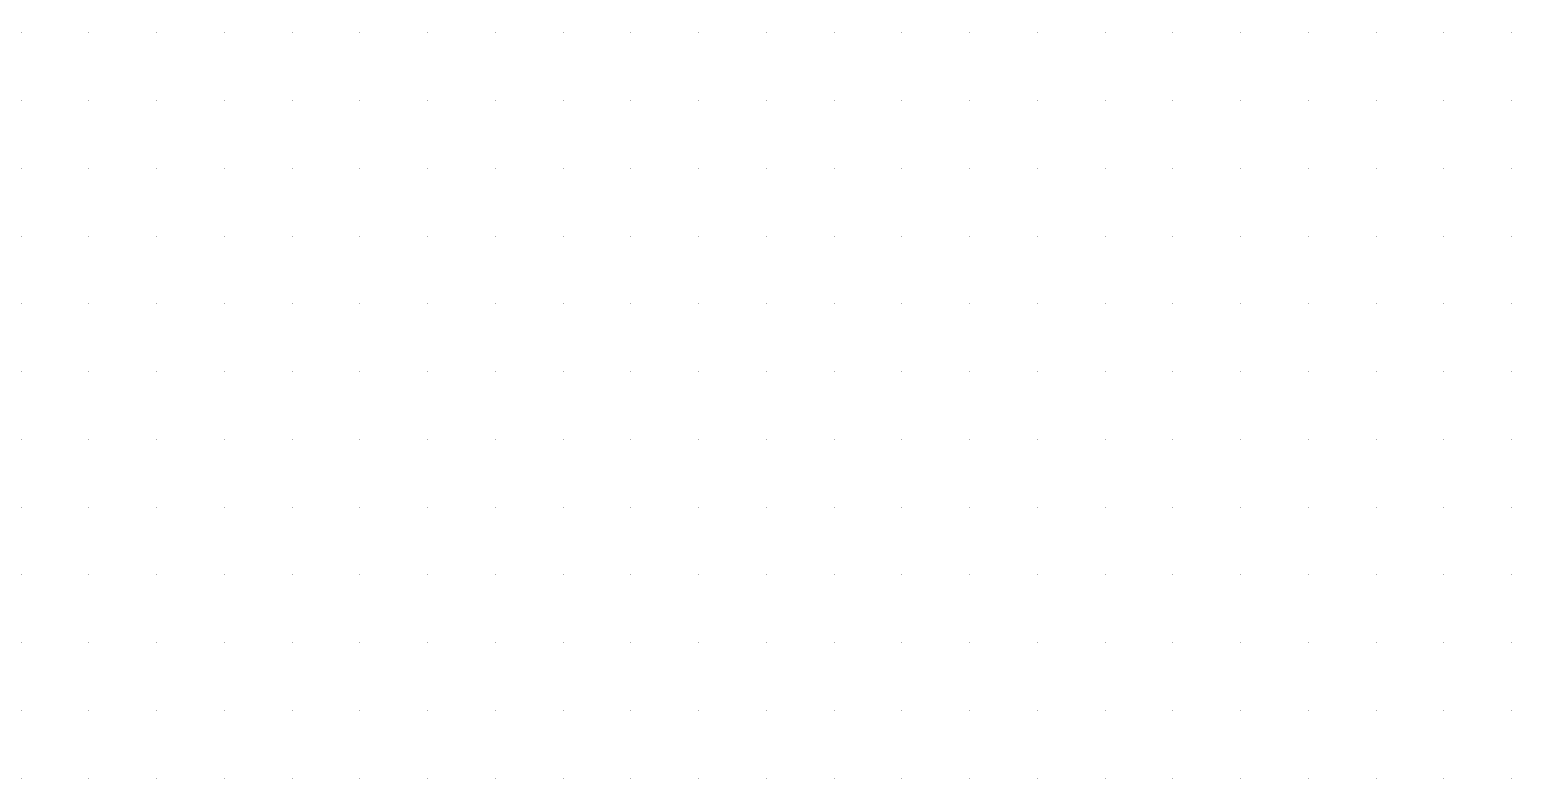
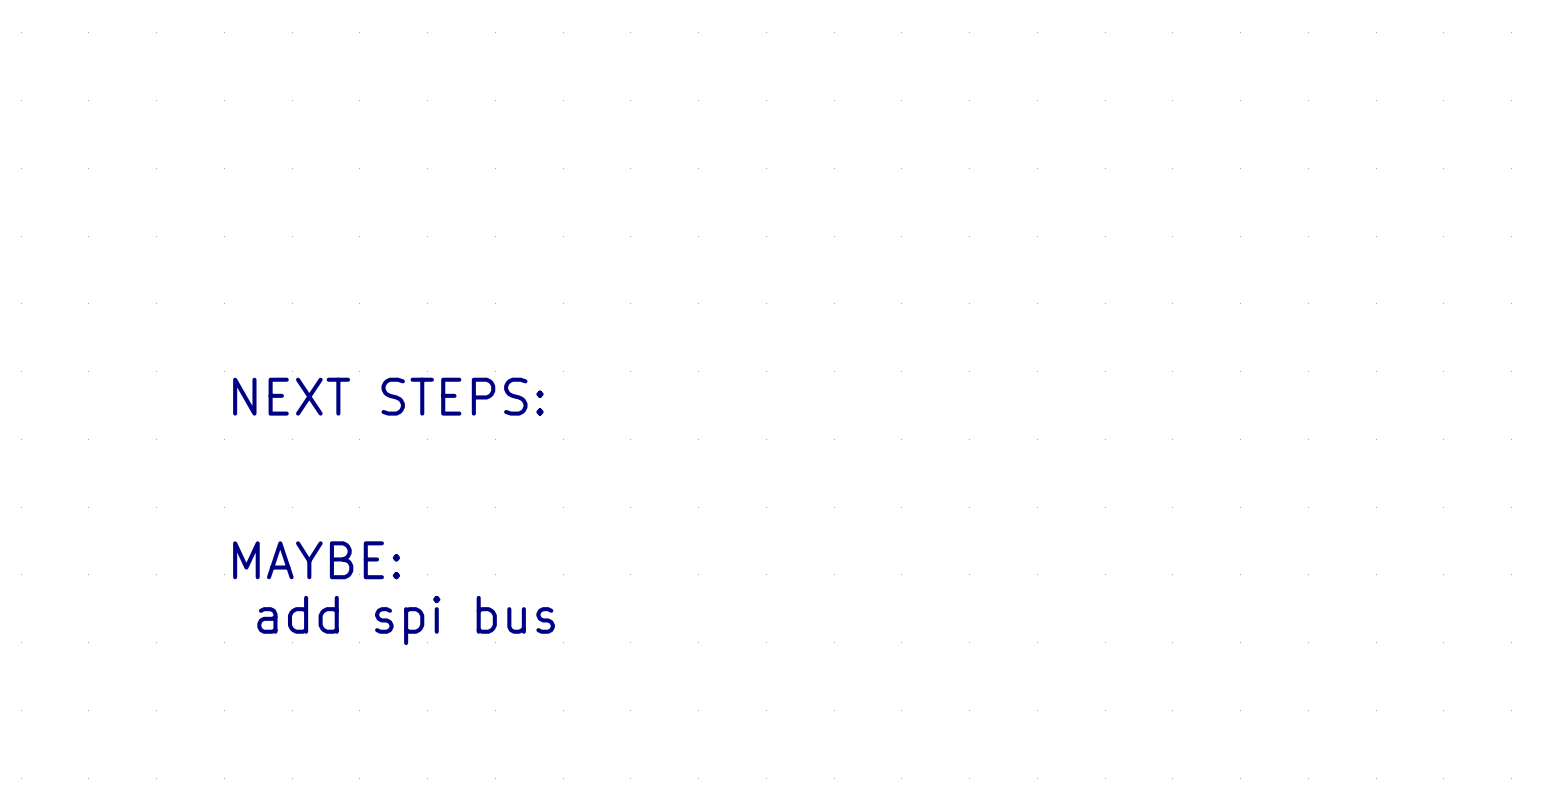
text: none -> NEXT STEPS: (388, 396)
text: none -> MAYBE: (316, 560)
text: none -> add spi bus (406, 620)

